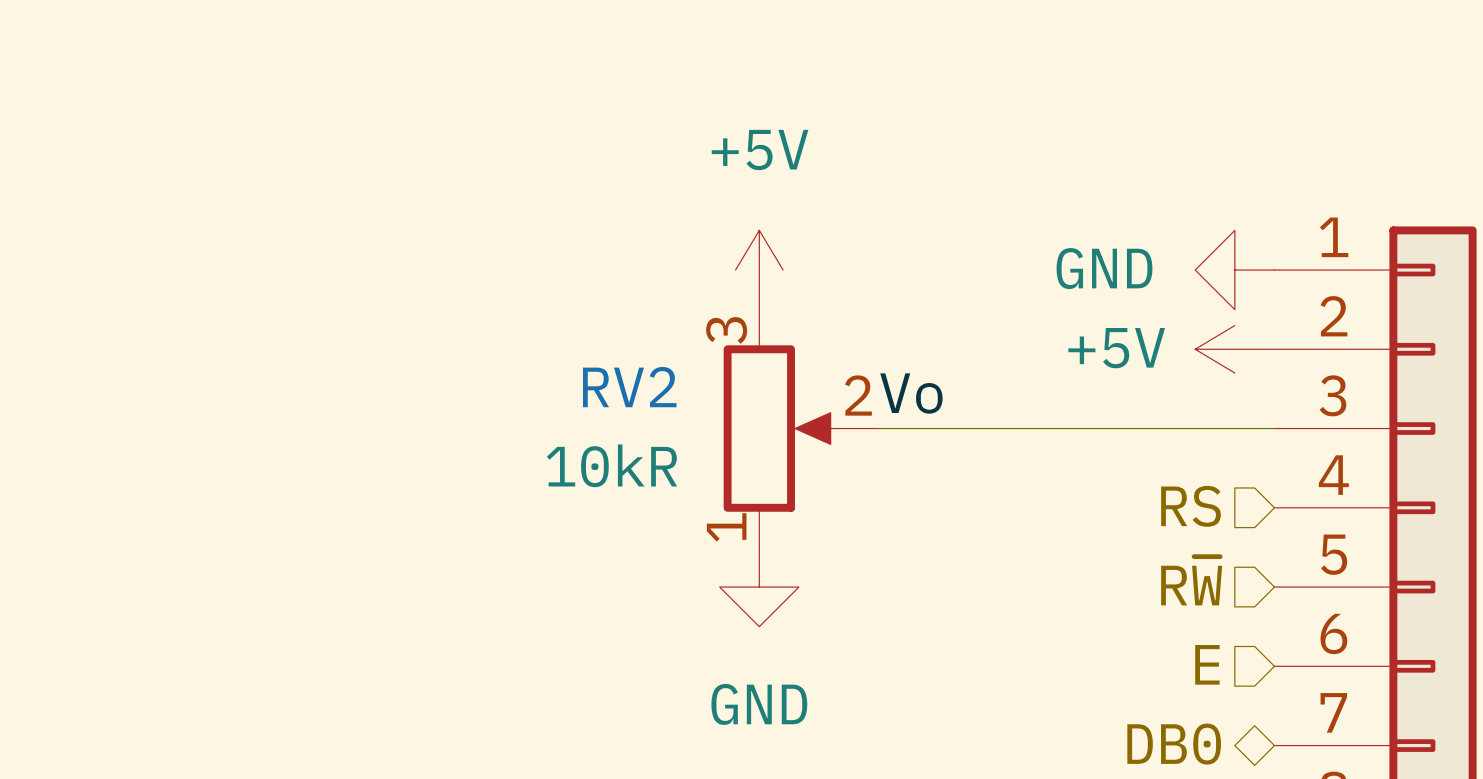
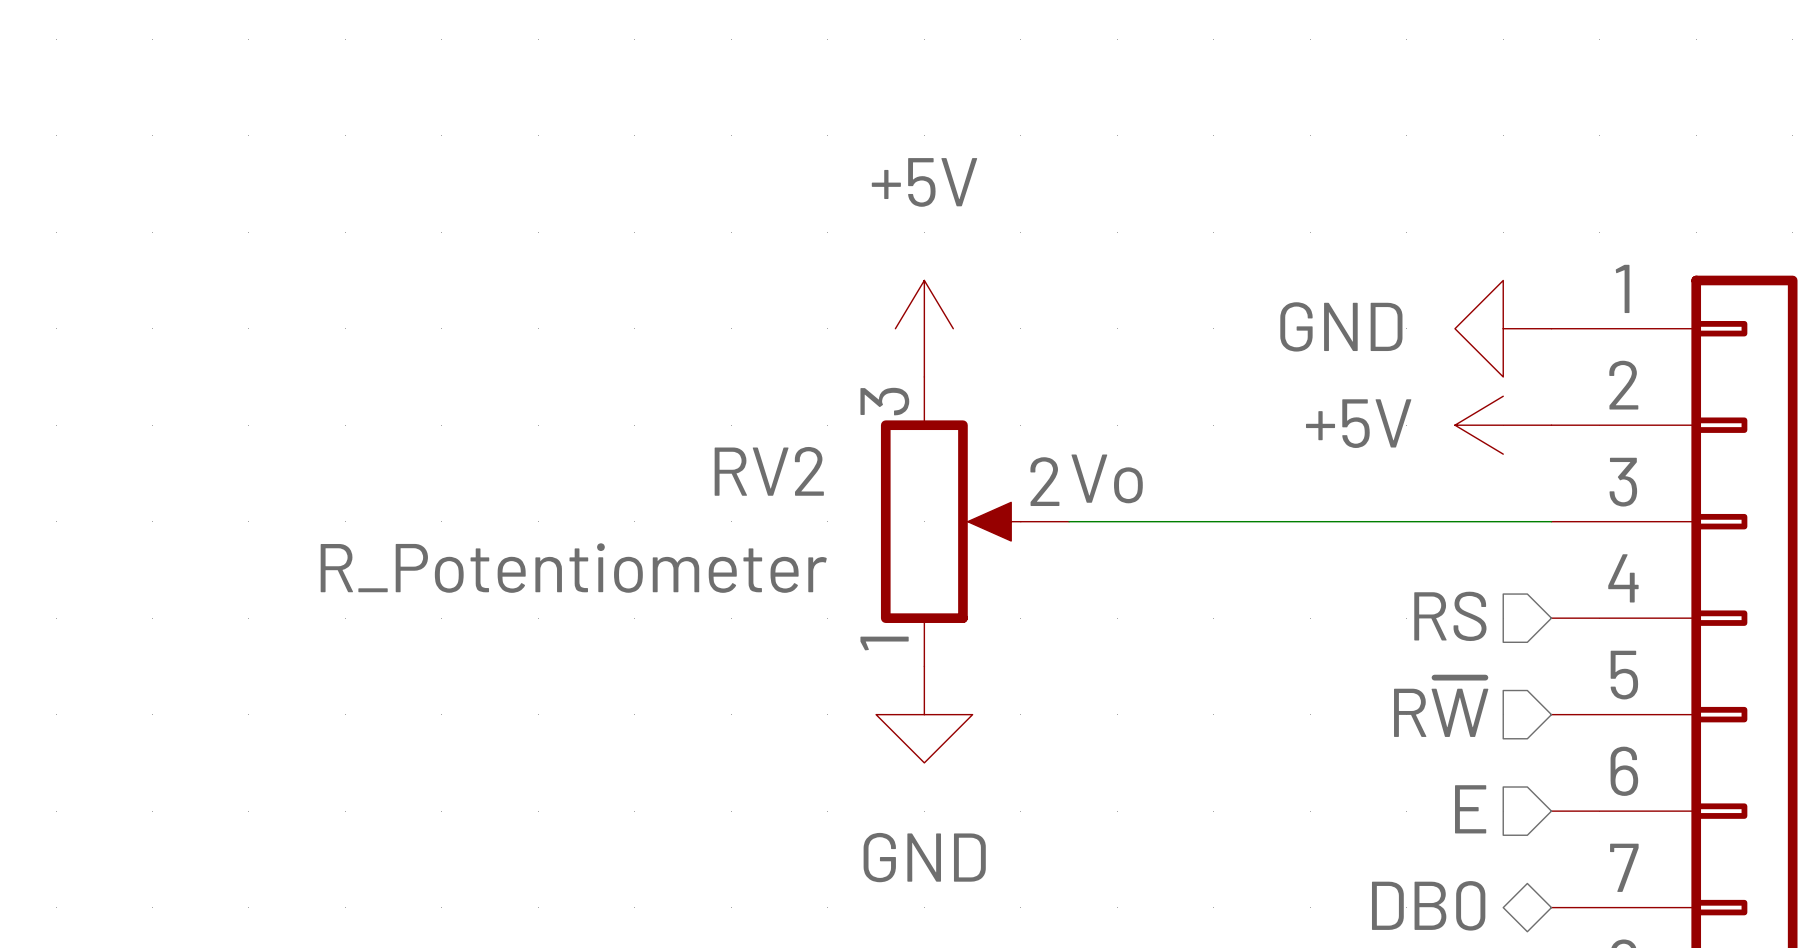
RV2 value: 10kR (611, 465) -> R_Potentiometer (573, 568)

